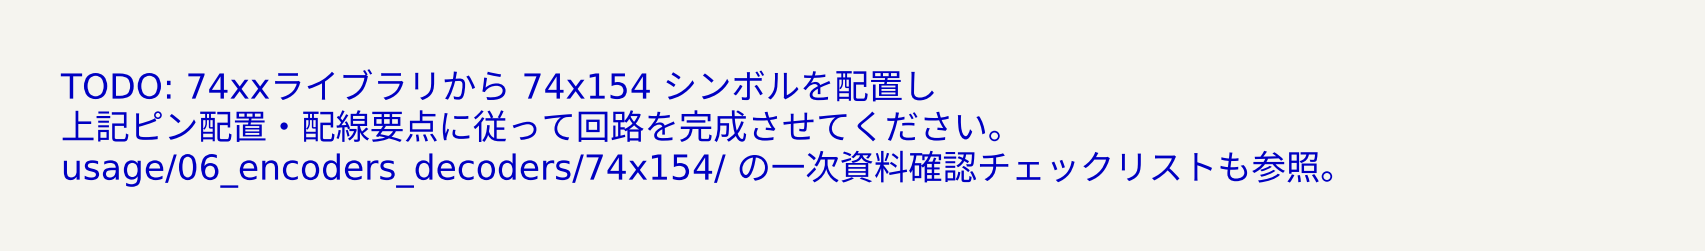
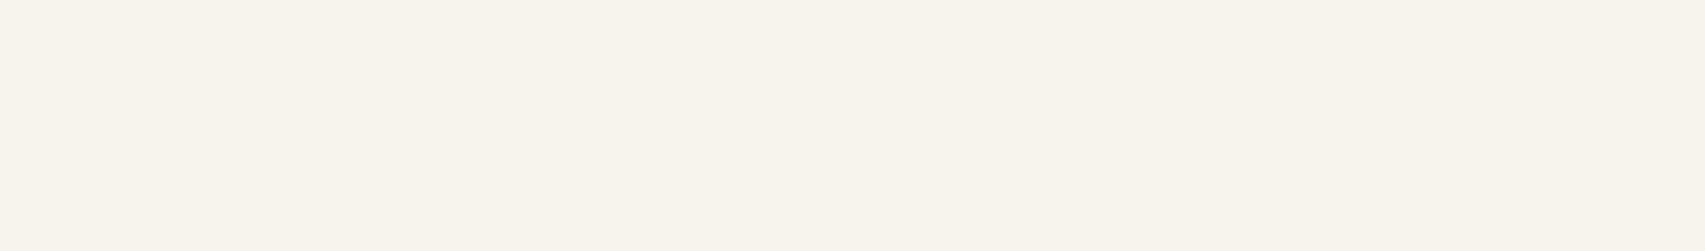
text: TODO: 74xxライブラリから 74x154 シンボルを配置し (497, 85) -> none
text: 上記ピン配置・配線要点に従って回路を完成させてください。 (531, 126) -> none
text: usage/06_encoders_decoders/74x154/ の一次資料確認チェックリストも参照。 (698, 169) -> none

